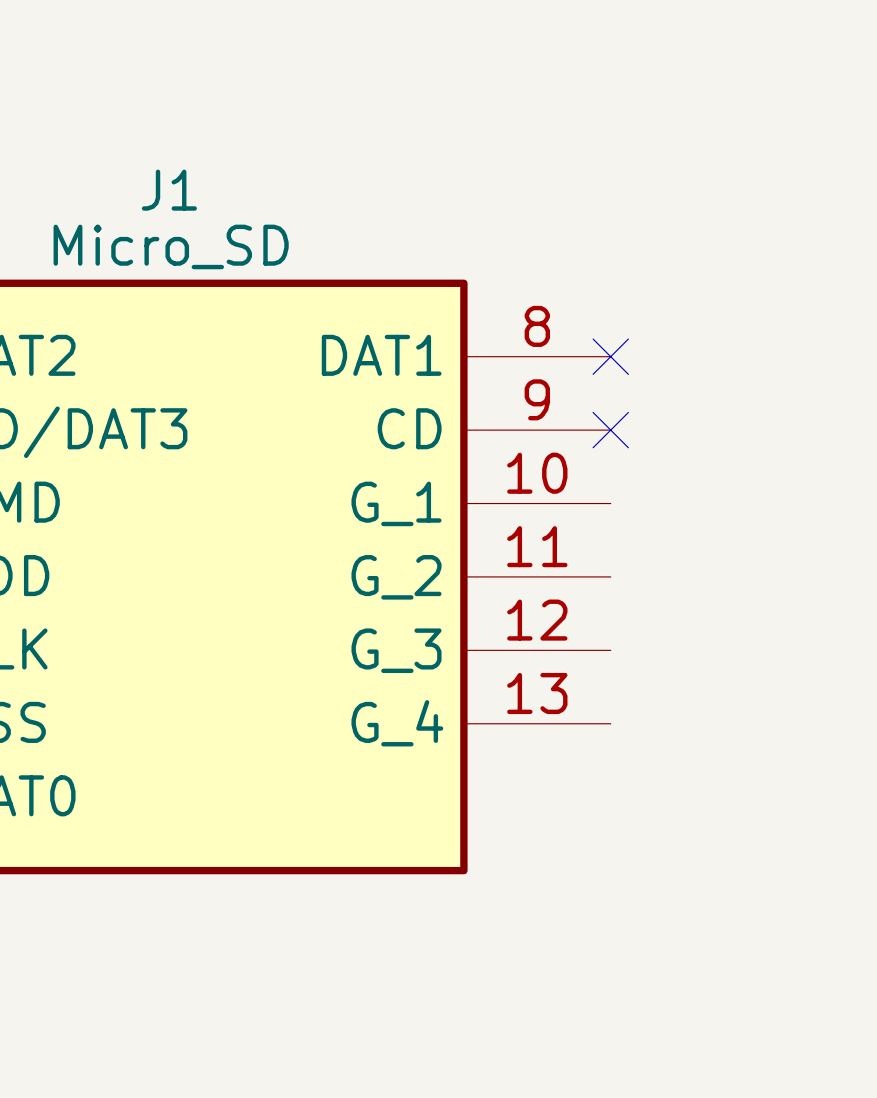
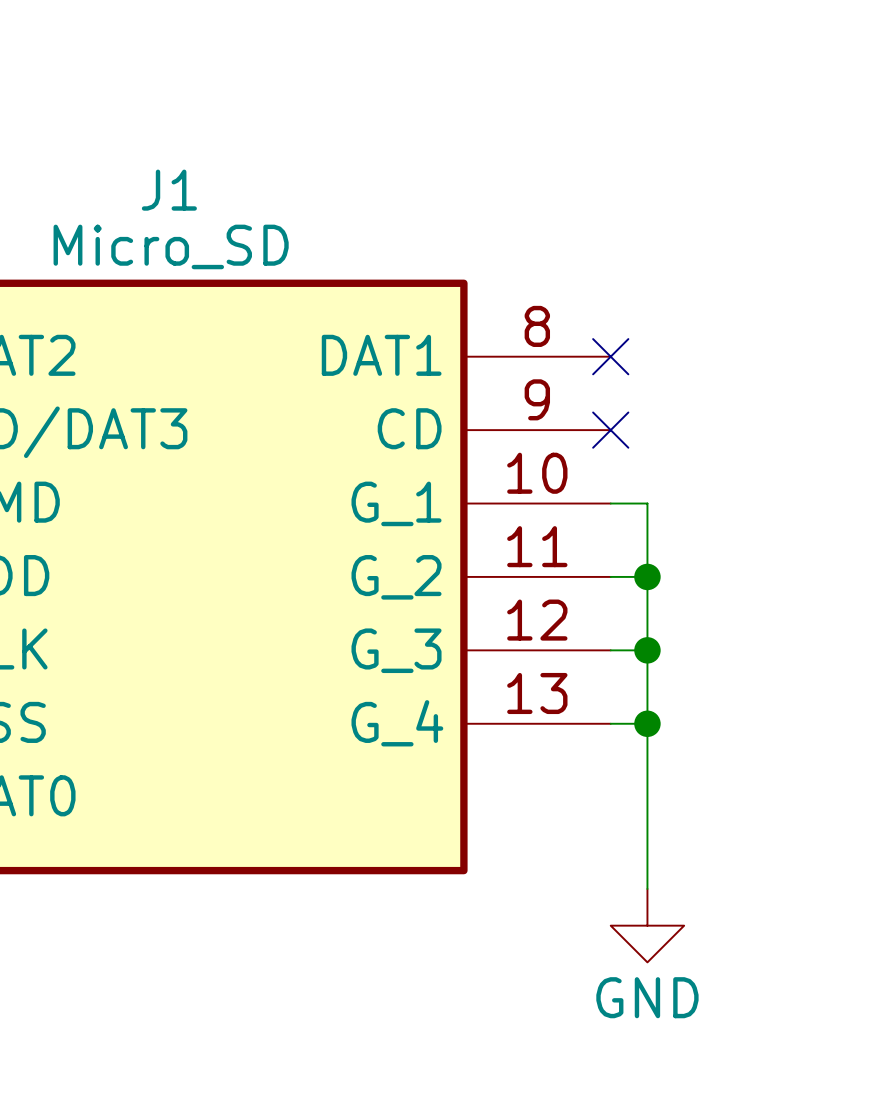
wire: none -> (610, 503) (647, 503) (647, 888)
wire: none -> (610, 576) (647, 576)
junction: none -> (647, 576)
wire: none -> (610, 650) (647, 650)
junction: none -> (647, 650)
wire: none -> (610, 723) (647, 723)
junction: none -> (647, 723)
power symbol: none -> GND (647, 925)

